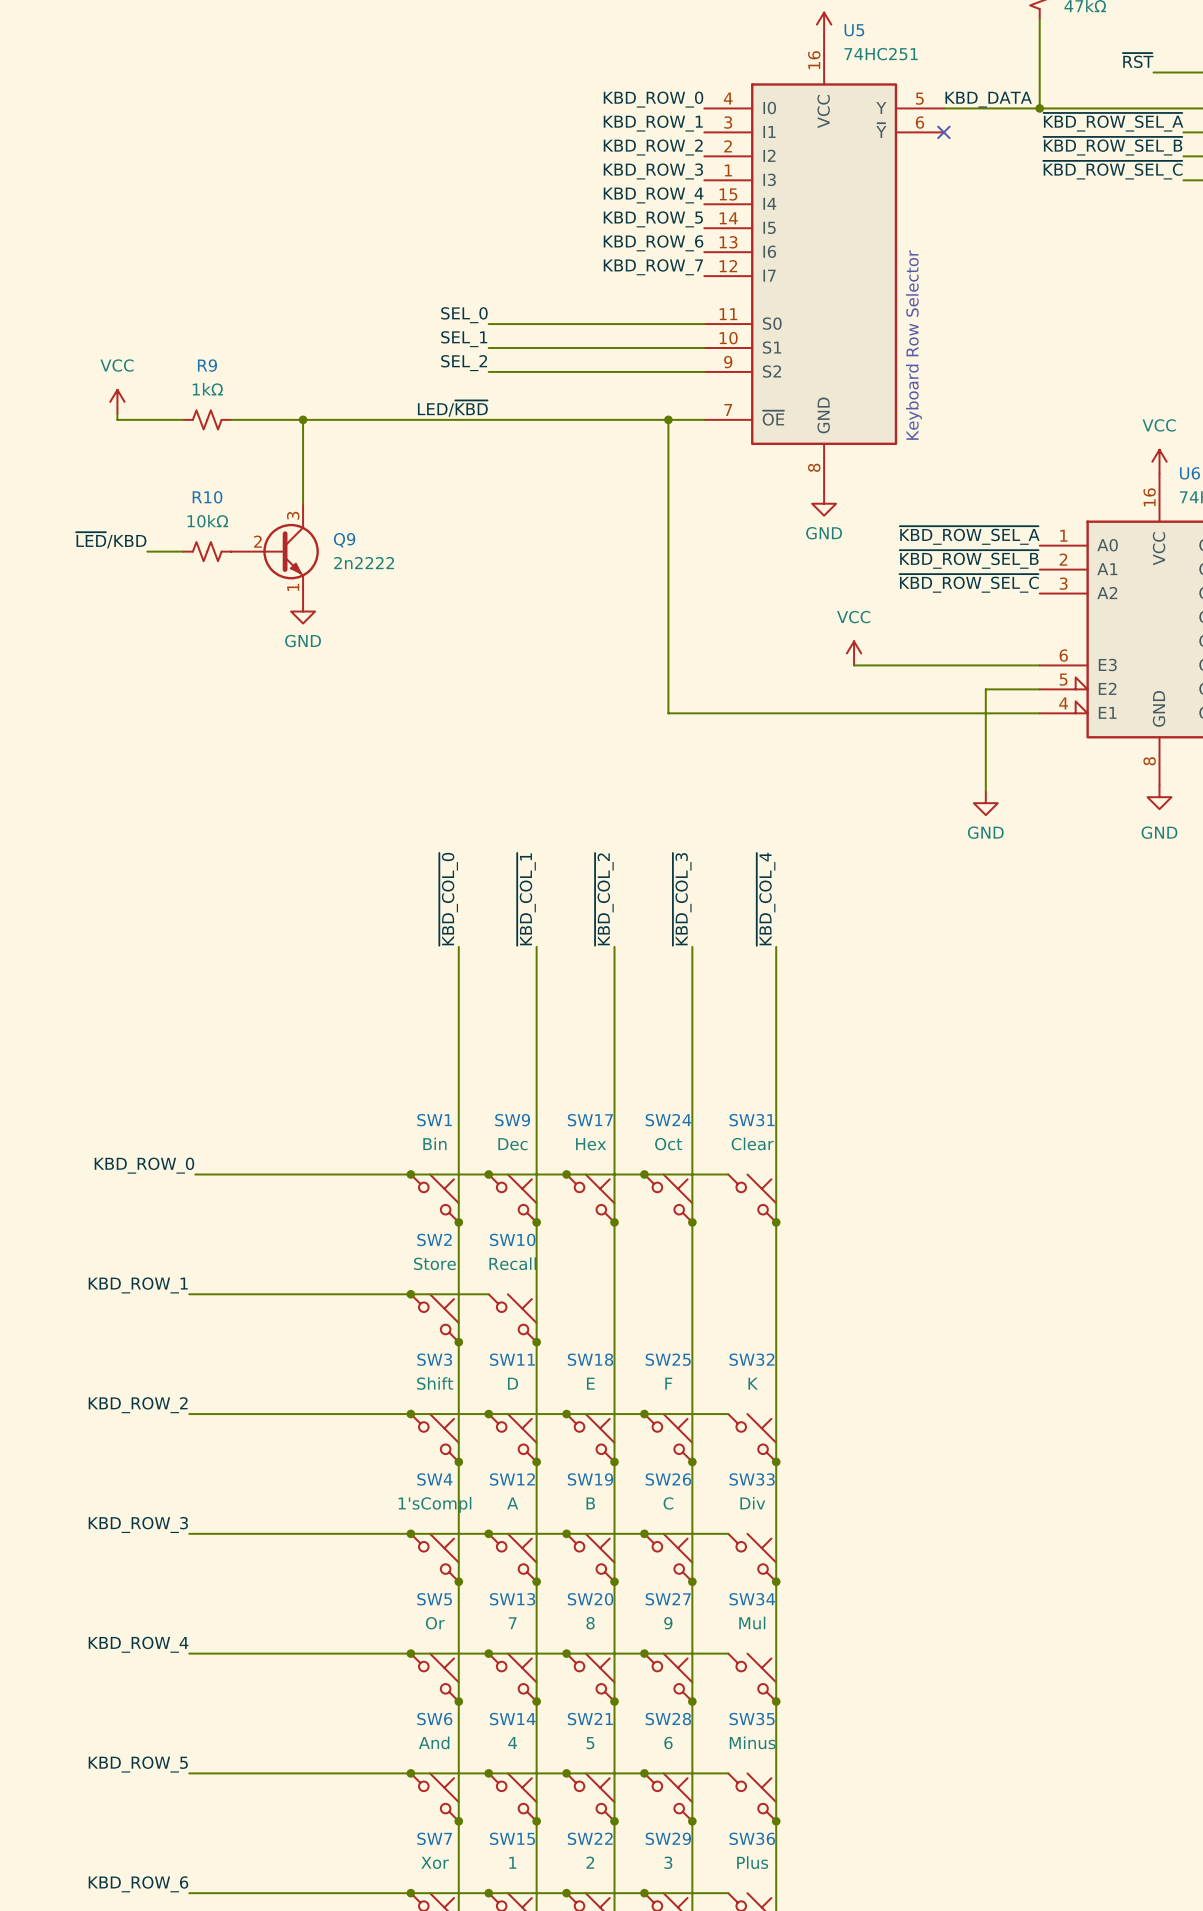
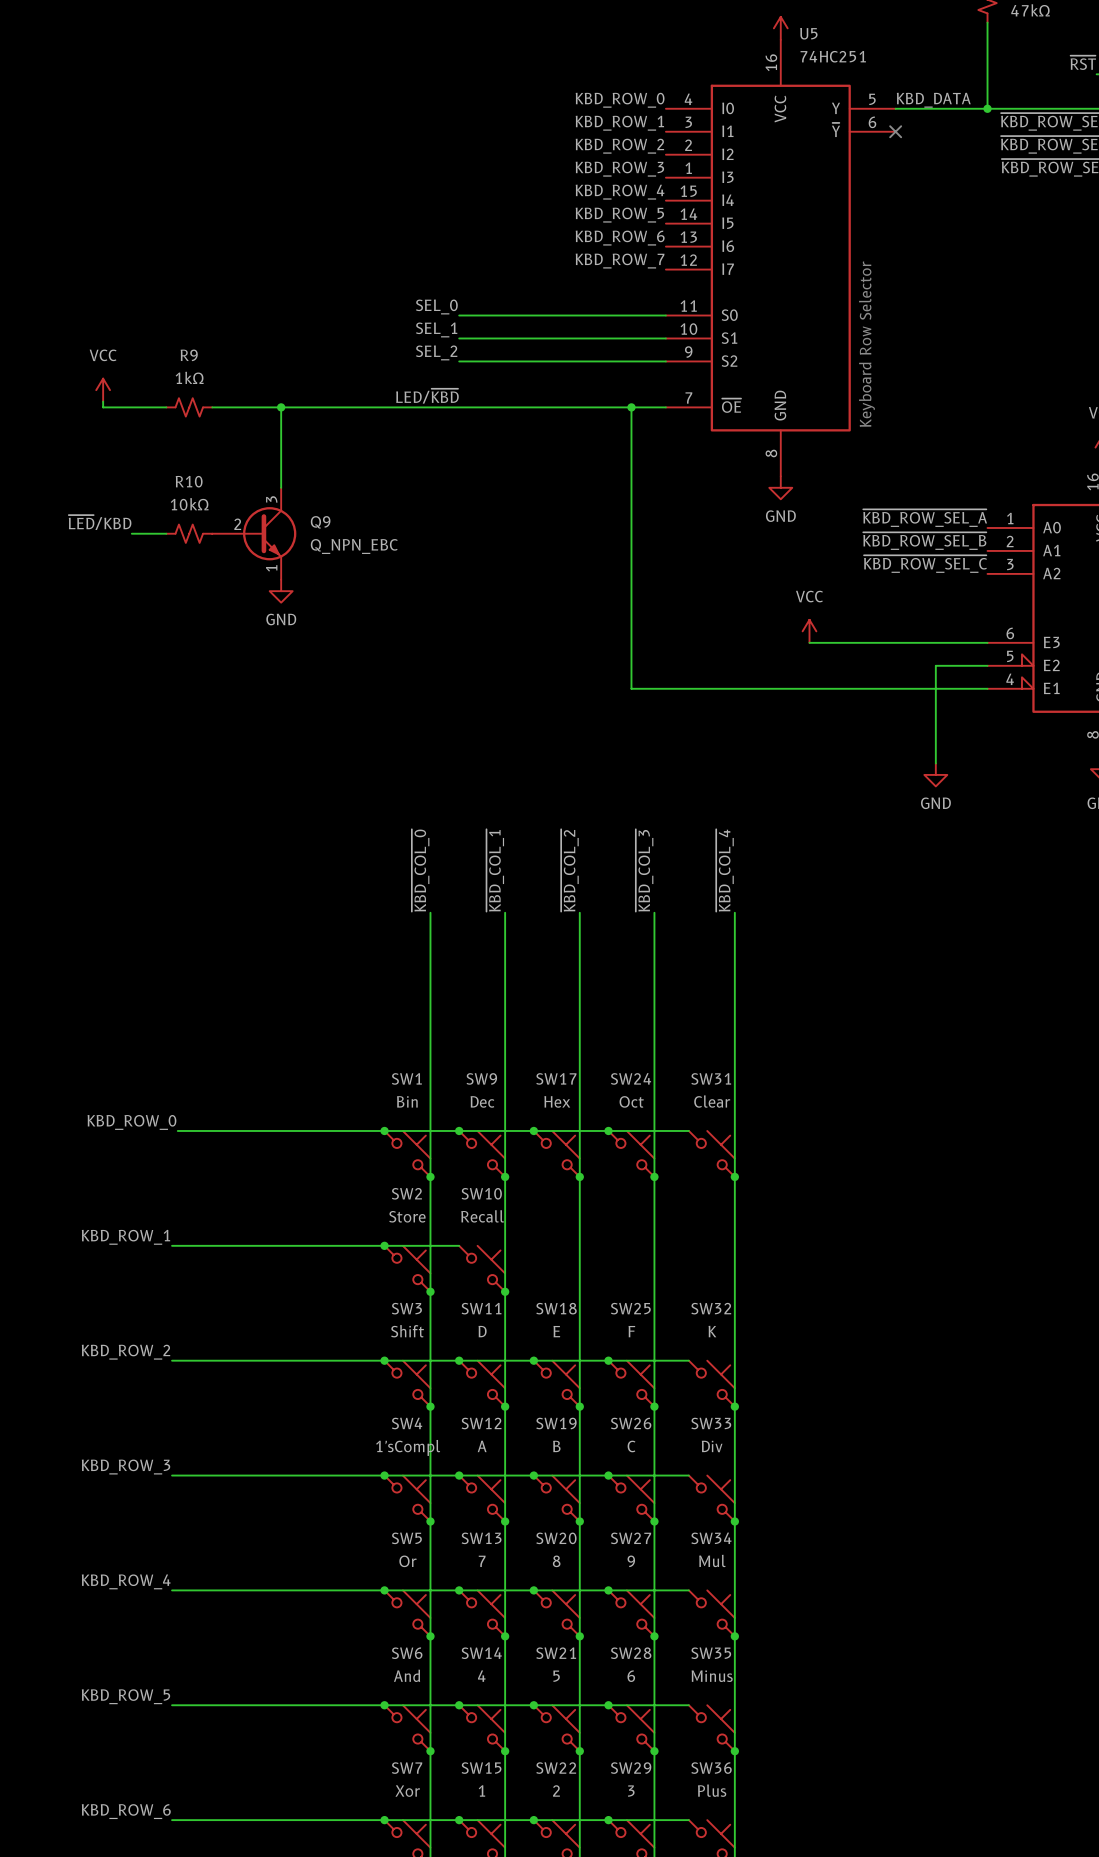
Q9 value: 2n2222 (364, 563) -> Q_NPN_EBC (354, 546)

